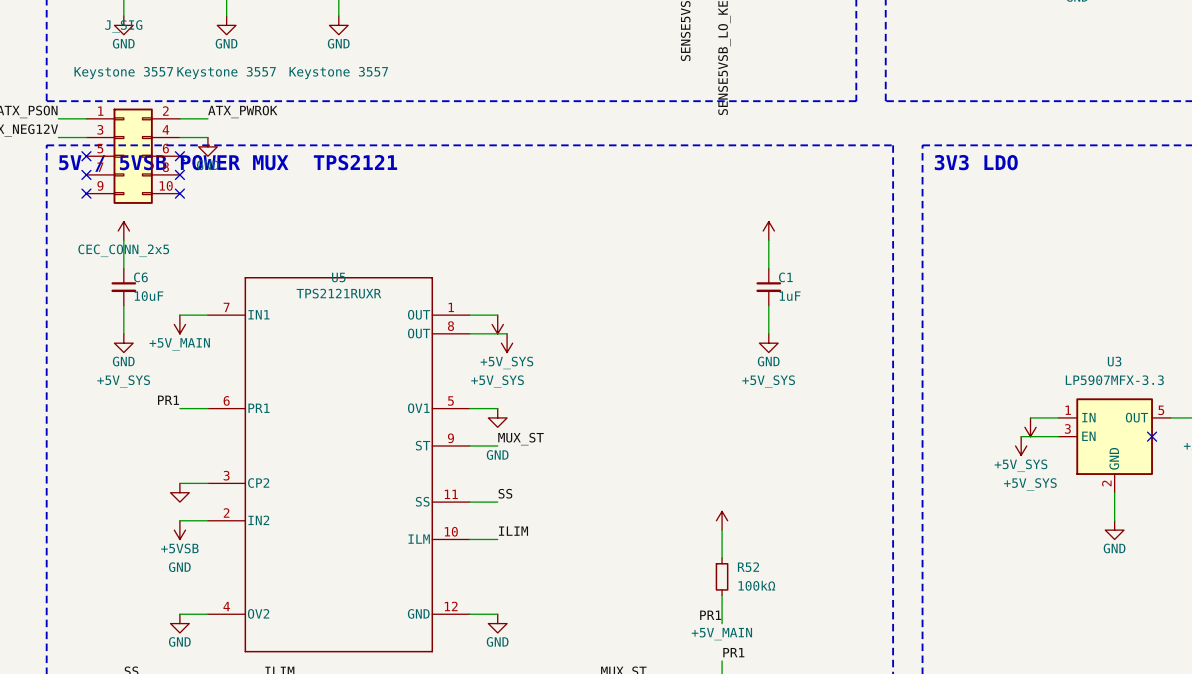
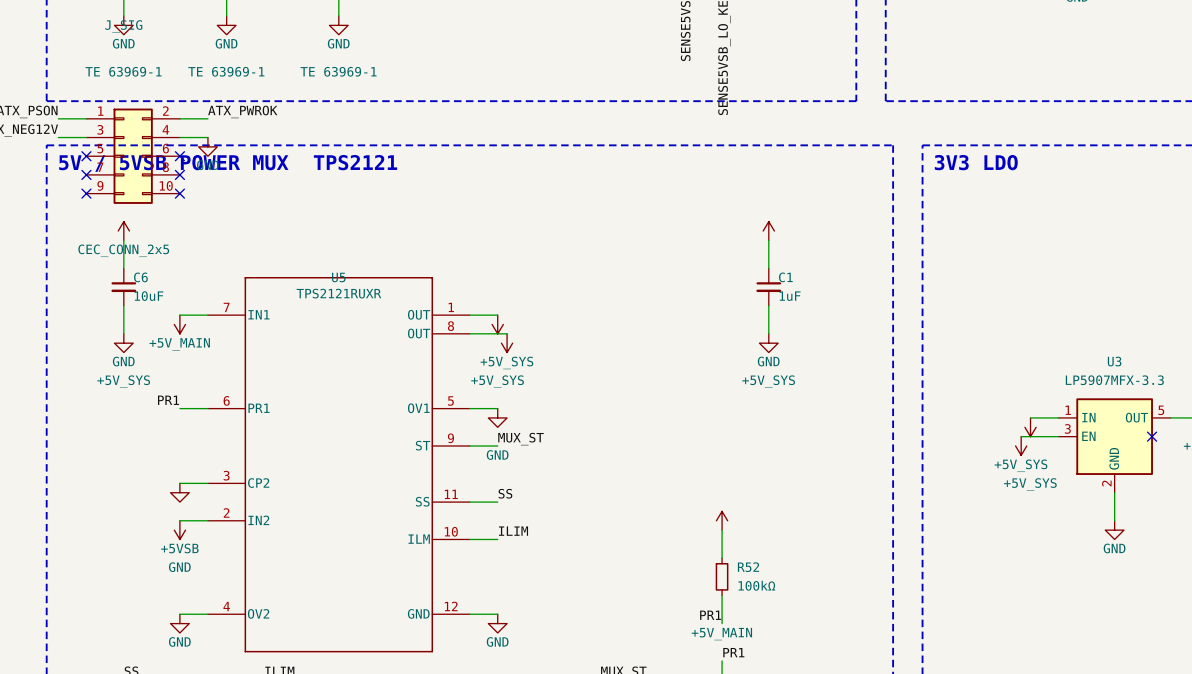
part value: Keystone 3557 (123, 73) -> TE 63969-1 (123, 71)
part value: Keystone 3557 (226, 73) -> TE 63969-1 (226, 71)
part value: Keystone 3557 (338, 73) -> TE 63969-1 (338, 71)

